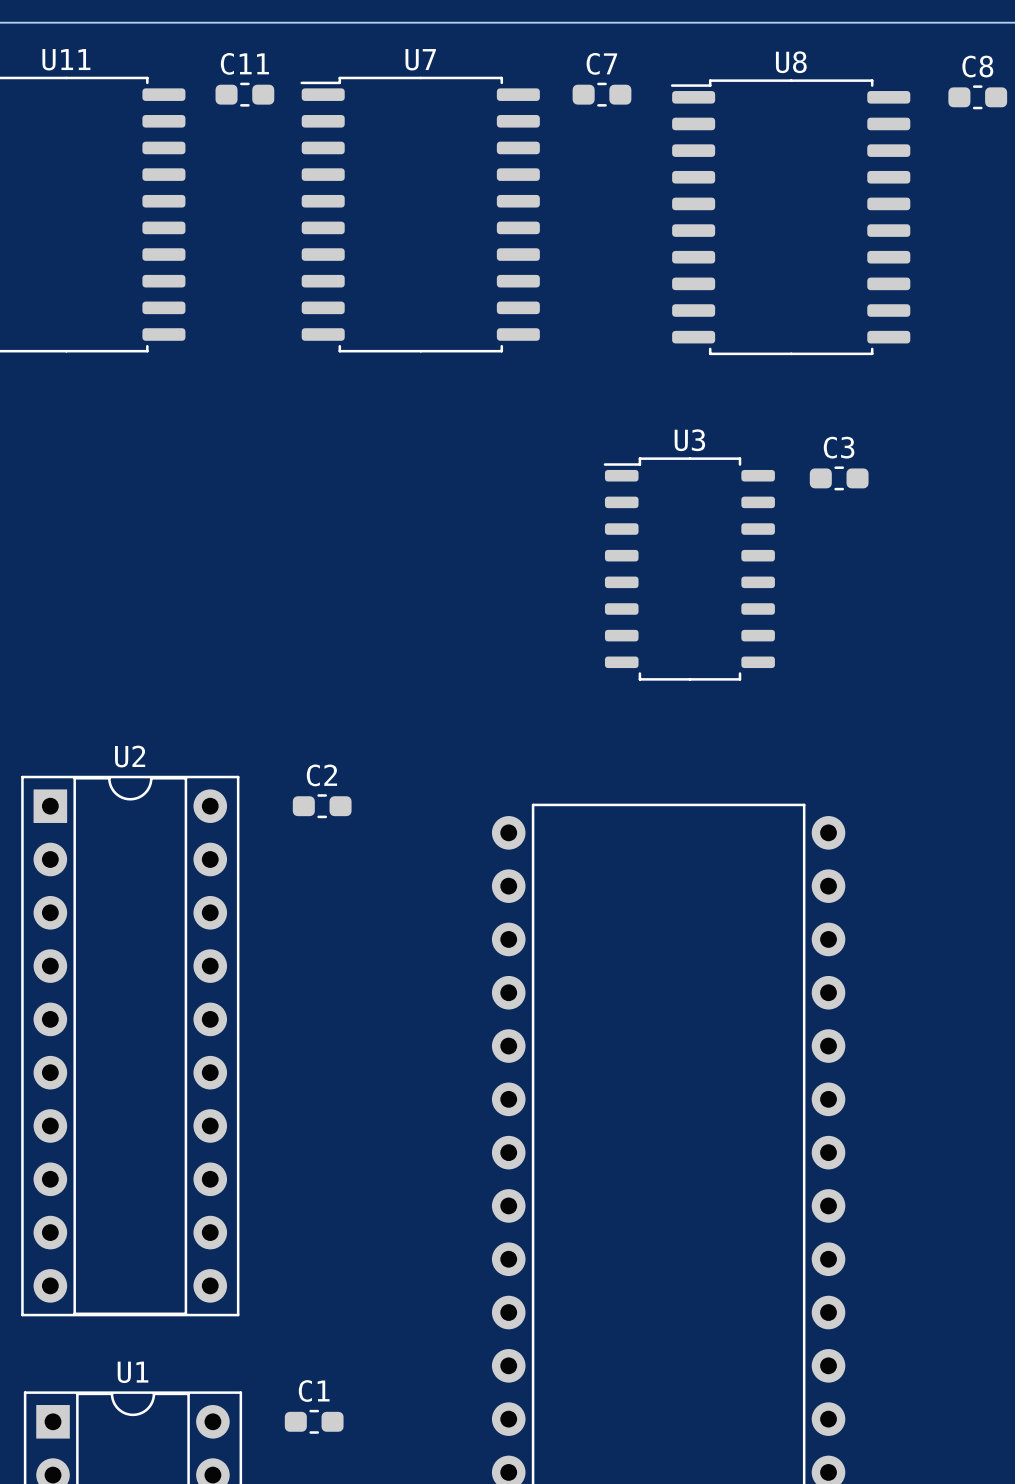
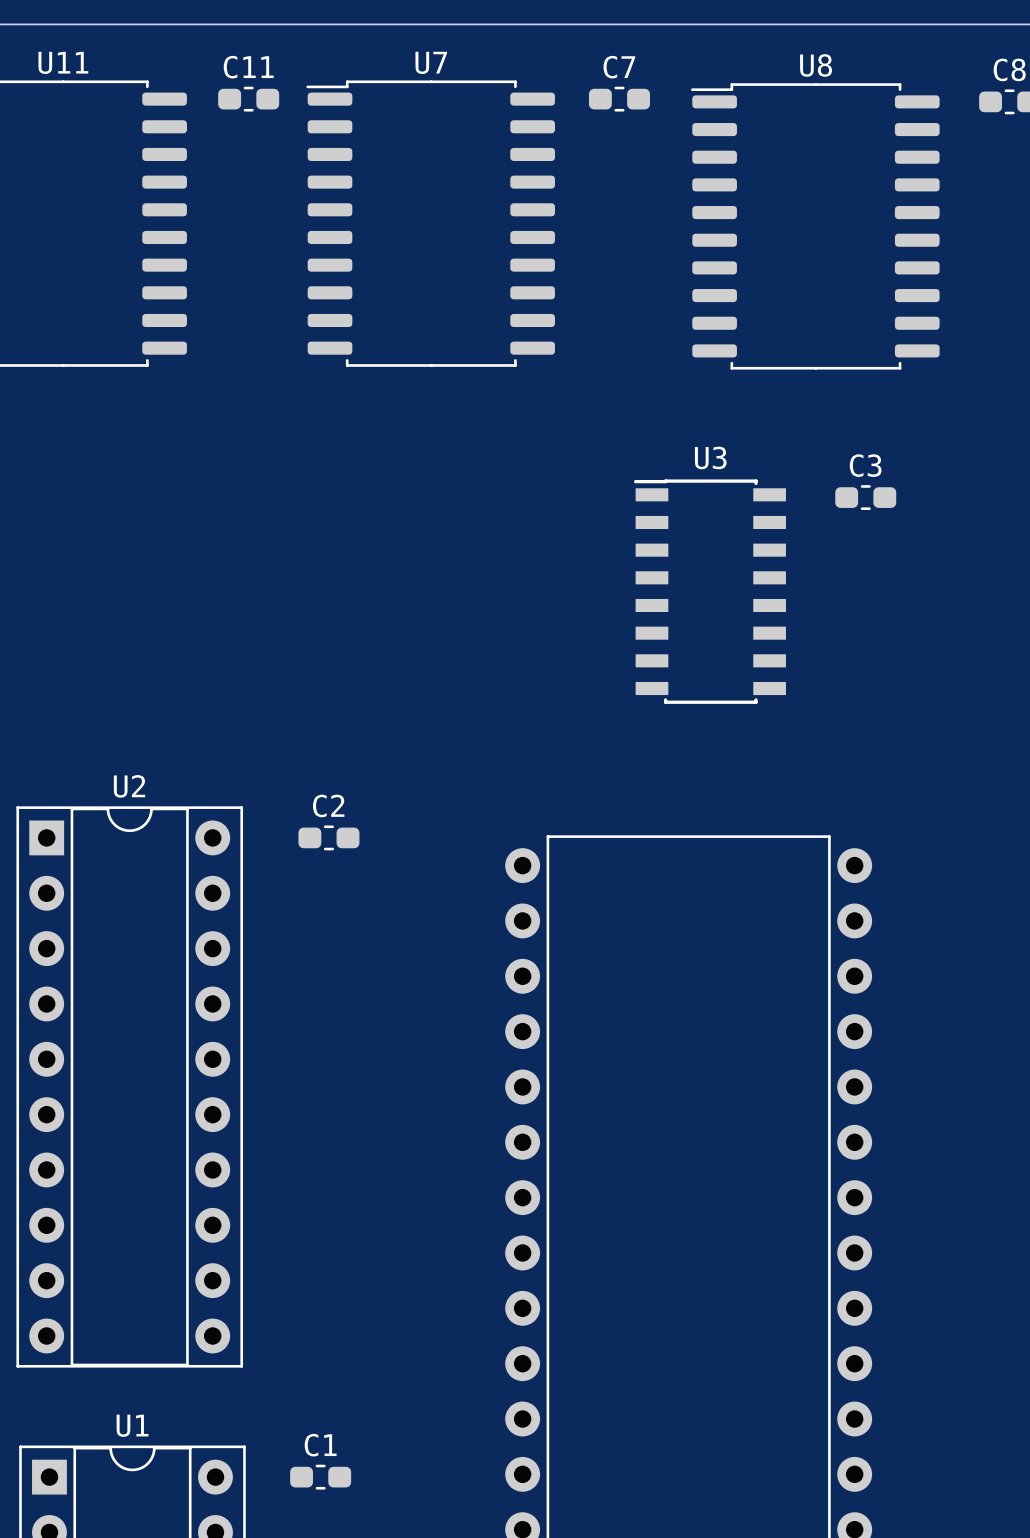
U3 footprint: [603, 457, 775, 681] -> [633, 479, 786, 704]

